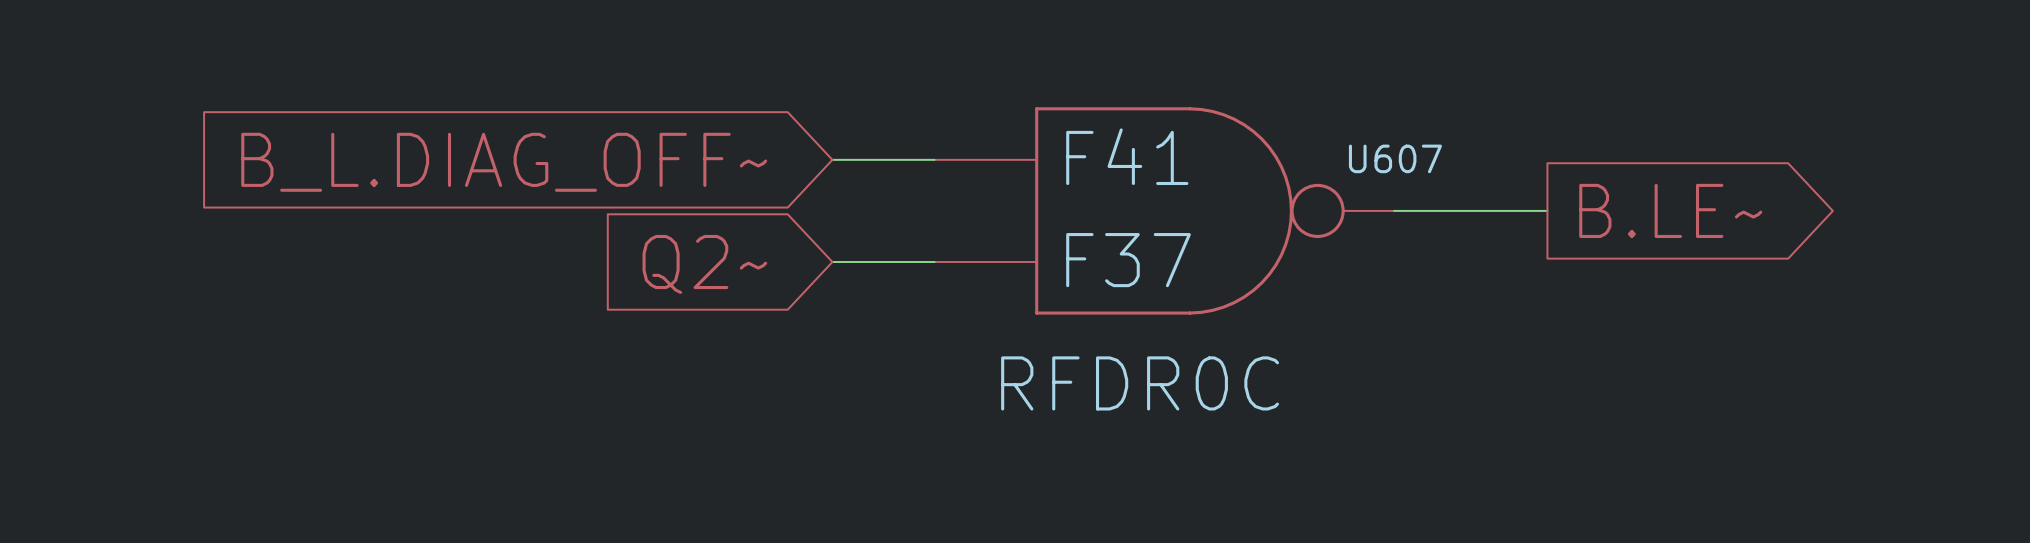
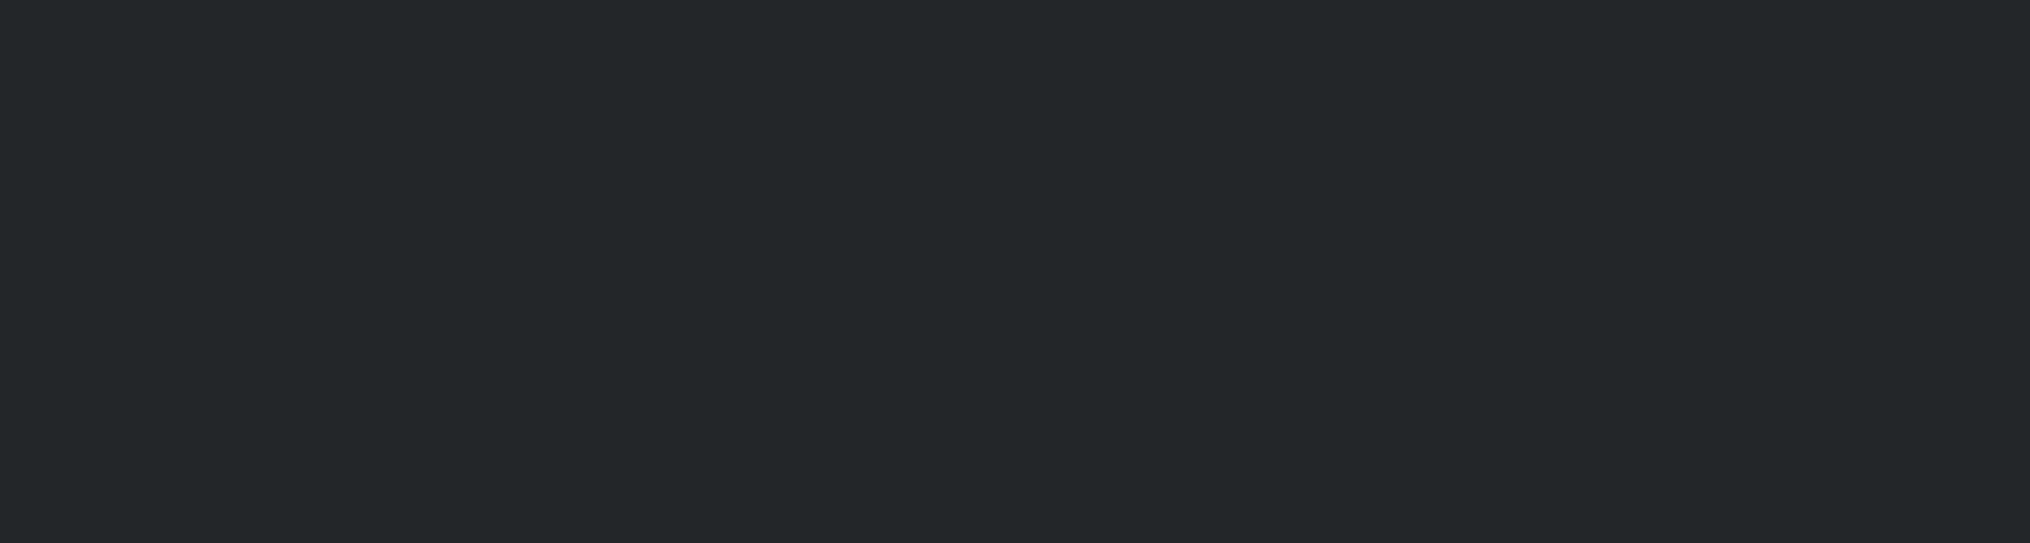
wire: (832, 159) (934, 159) -> none
global label: B_L.DIAG_OFF~ (504, 162) -> none
U607: F37 (1164, 210) -> none
wire: (1394, 210) (1547, 210) -> none
global label: B.LE~ (1670, 210) -> none
wire: (832, 262) (934, 262) -> none
global label: Q2~ (704, 264) -> none

